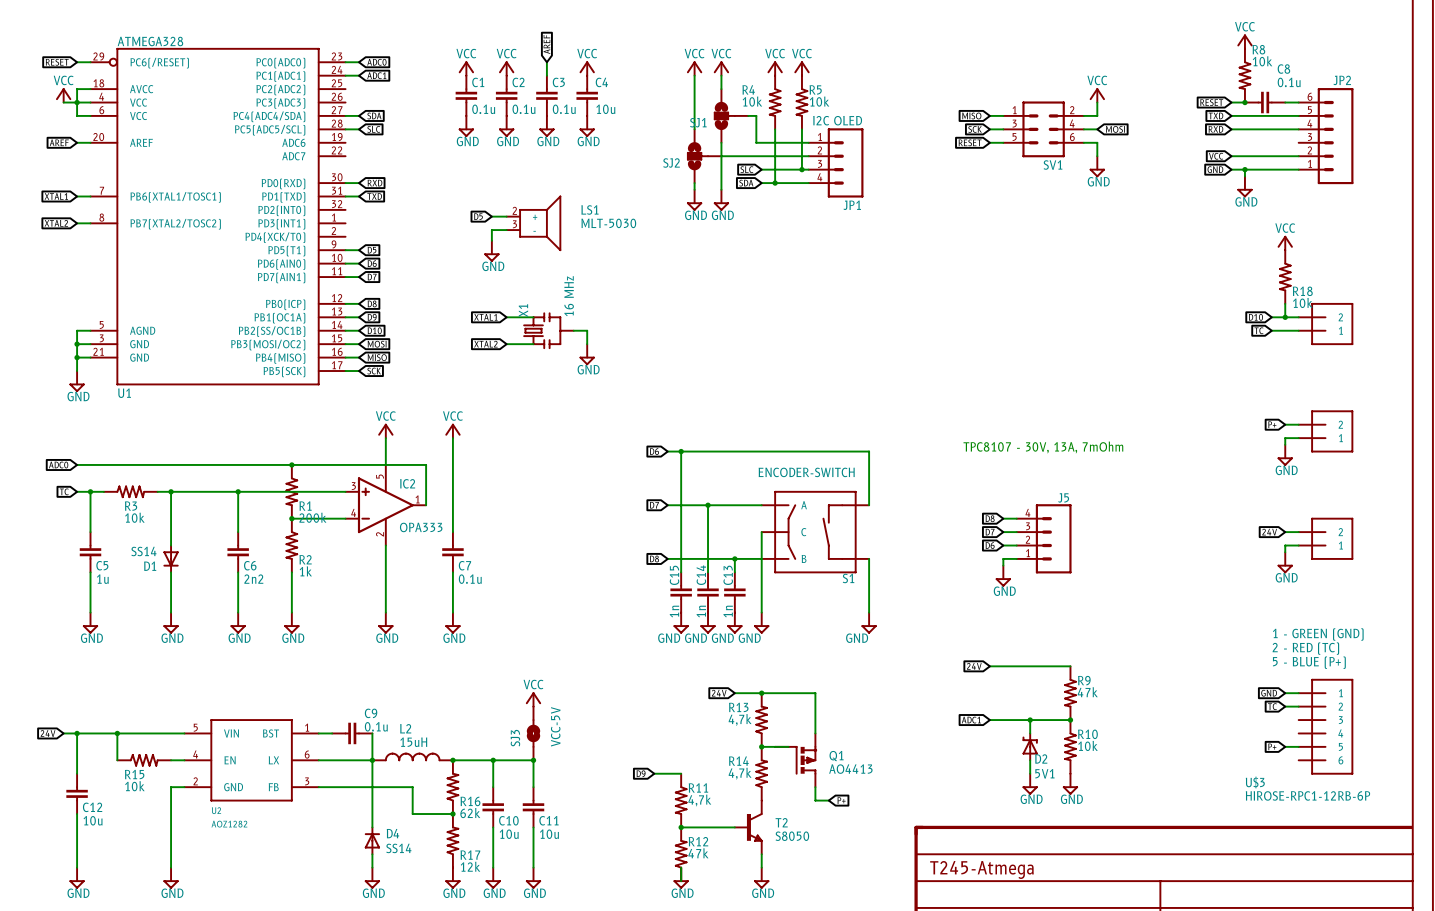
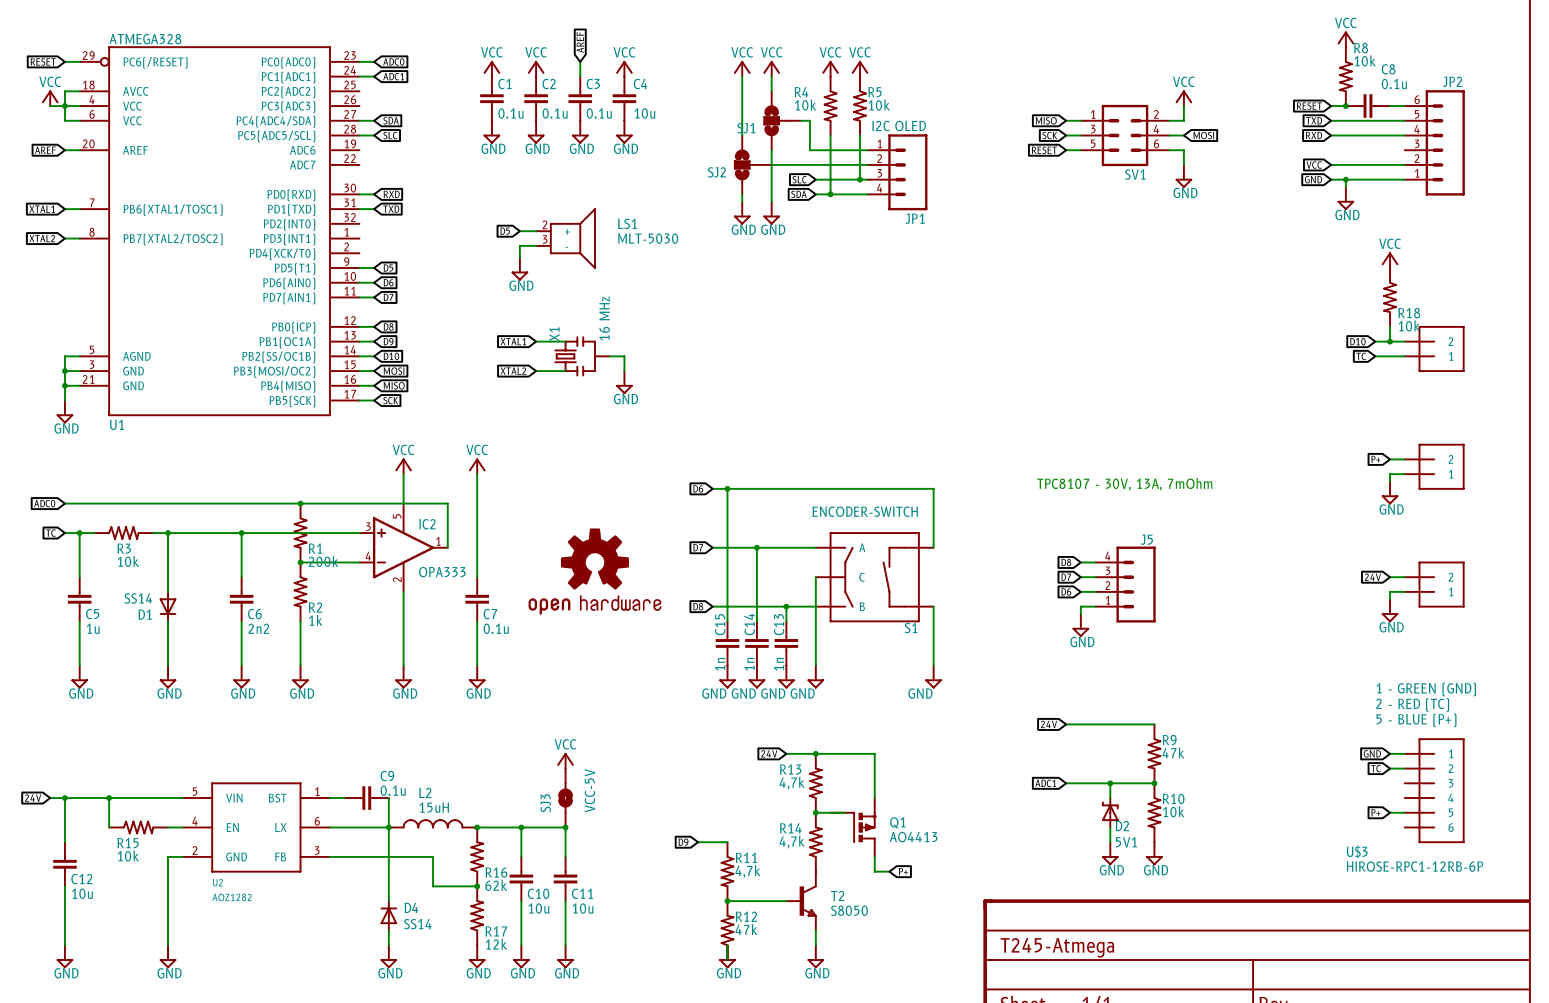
part: none -> (594, 571)

